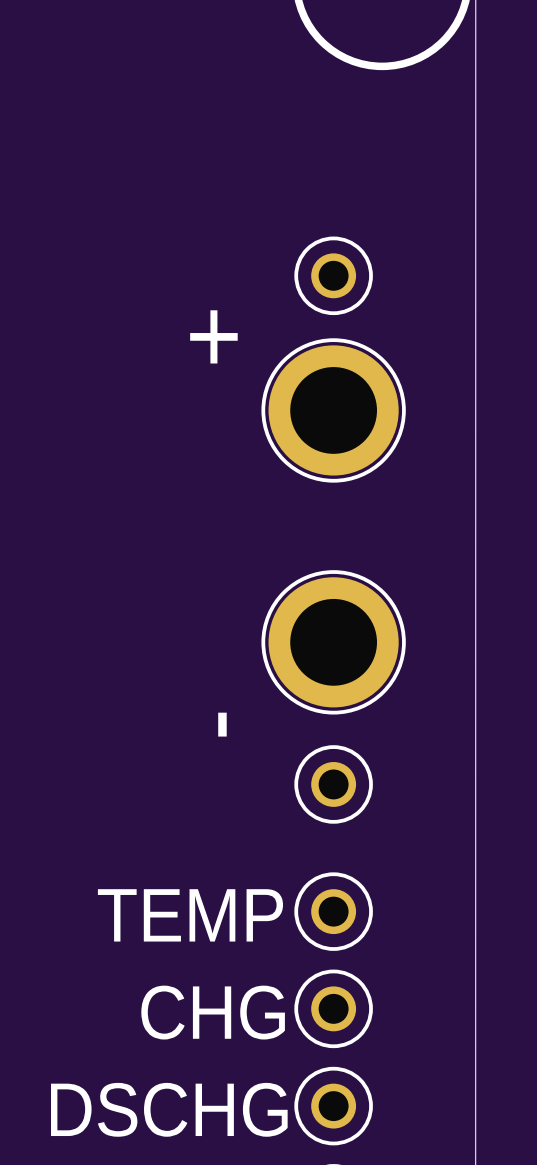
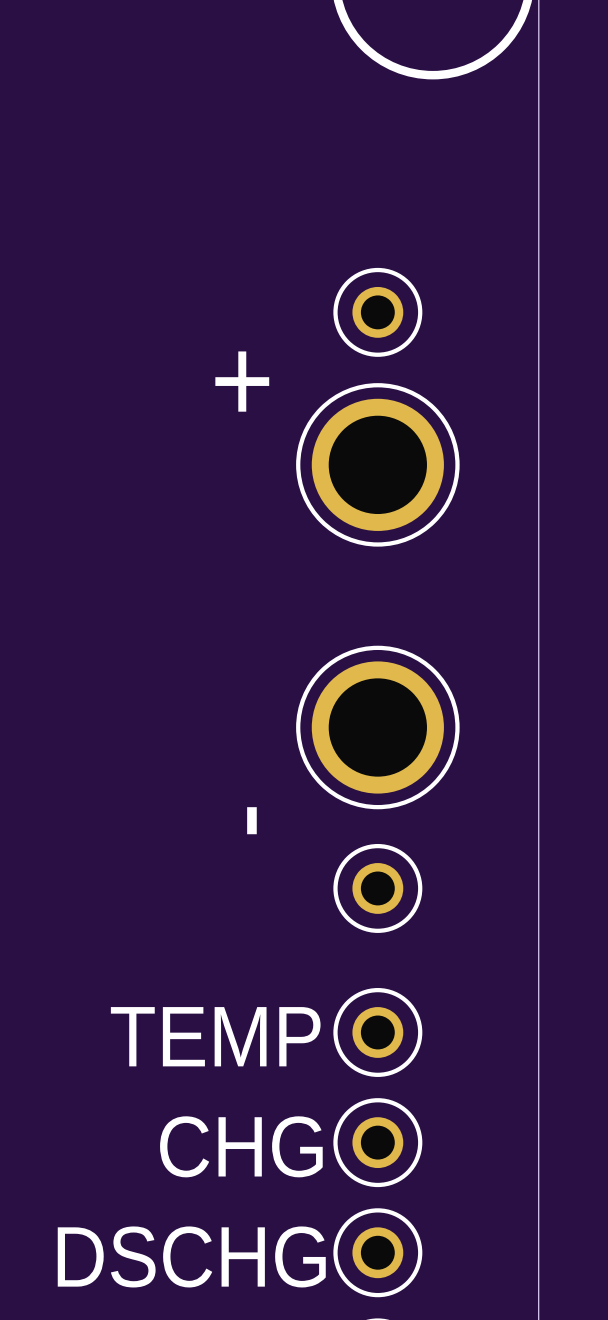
part footprint: [261, 338, 406, 483] -> [296, 383, 460, 547]
part footprint: [261, 570, 406, 715] -> [296, 645, 460, 810]

